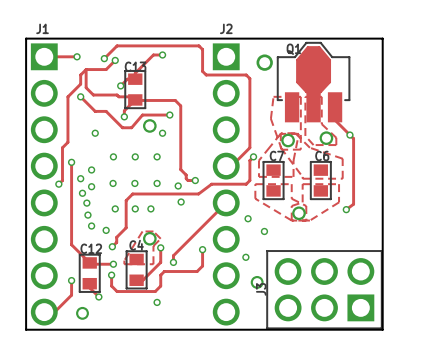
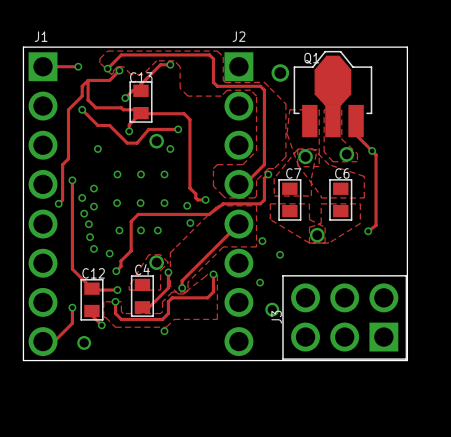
zone outline: none -> (107, 51) (99, 58) (99, 62) (111, 74) (117, 66) (123, 66) (131, 74) (142, 74) (156, 60) (174, 60) (180, 66) (180, 88) (187, 96) (221, 96) (227, 90) (250, 90) (256, 96) (256, 150) (242, 164) (217, 164) (213, 168) (213, 186) (225, 197) (254, 197) (256, 196) (256, 180) (268, 168) (274, 168) (285, 156) (285, 103) (264, 82) (225, 82) (223, 80) (223, 56) (217, 51) (107, 51)
zone outline: none -> (187, 290) (187, 282) (223, 246) (256, 246) (256, 205) (217, 205) (170, 252) (170, 286) (178, 293) (184, 293) (187, 290)
zone outline: none -> (187, 290) (207, 274) (217, 274) (217, 319) (174, 319) (166, 327) (115, 327) (103, 317) (103, 301) (121, 301) (121, 311) (123, 313) (160, 313) (162, 311) (162, 301) (172, 291) (186, 291)

